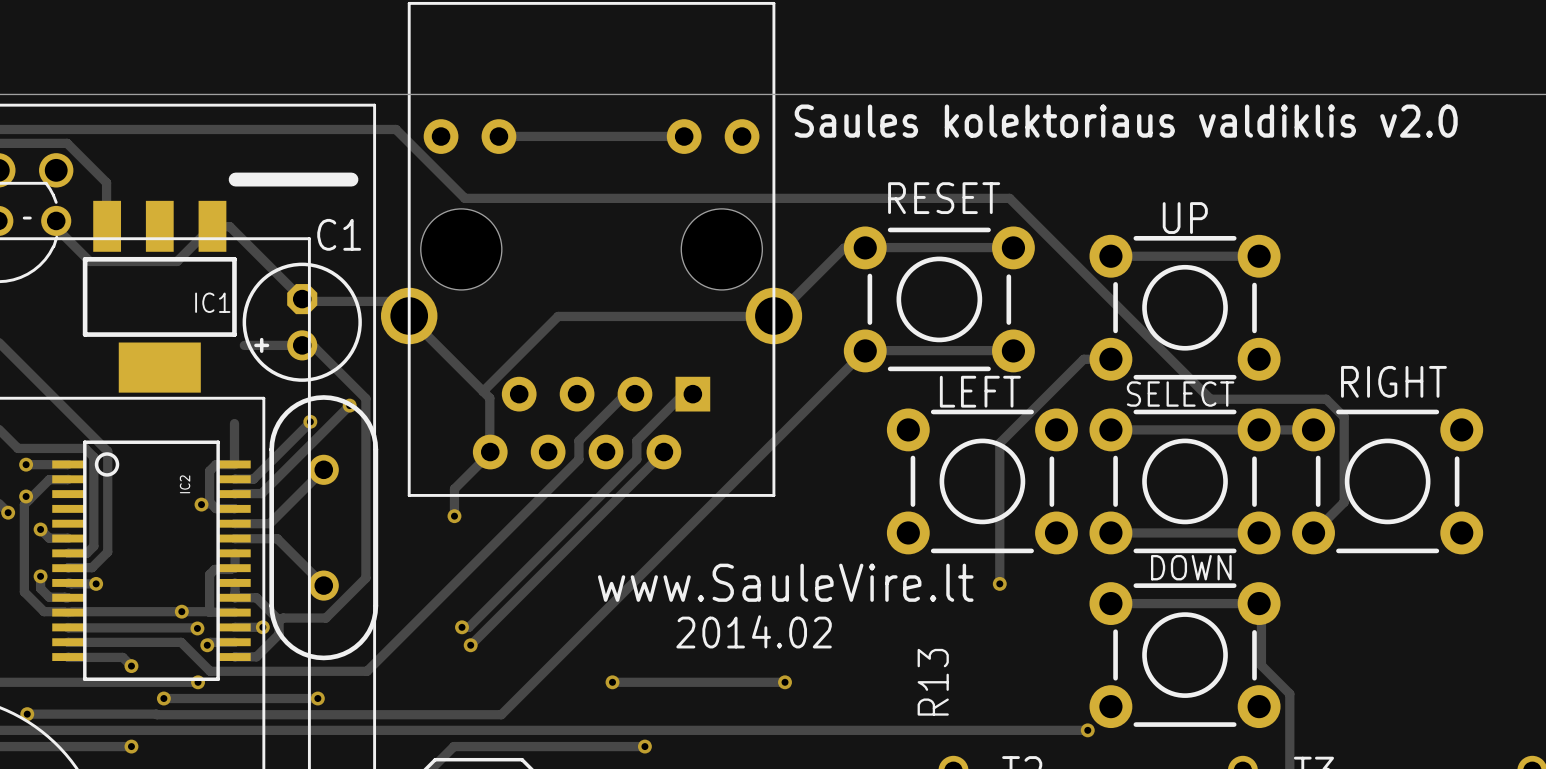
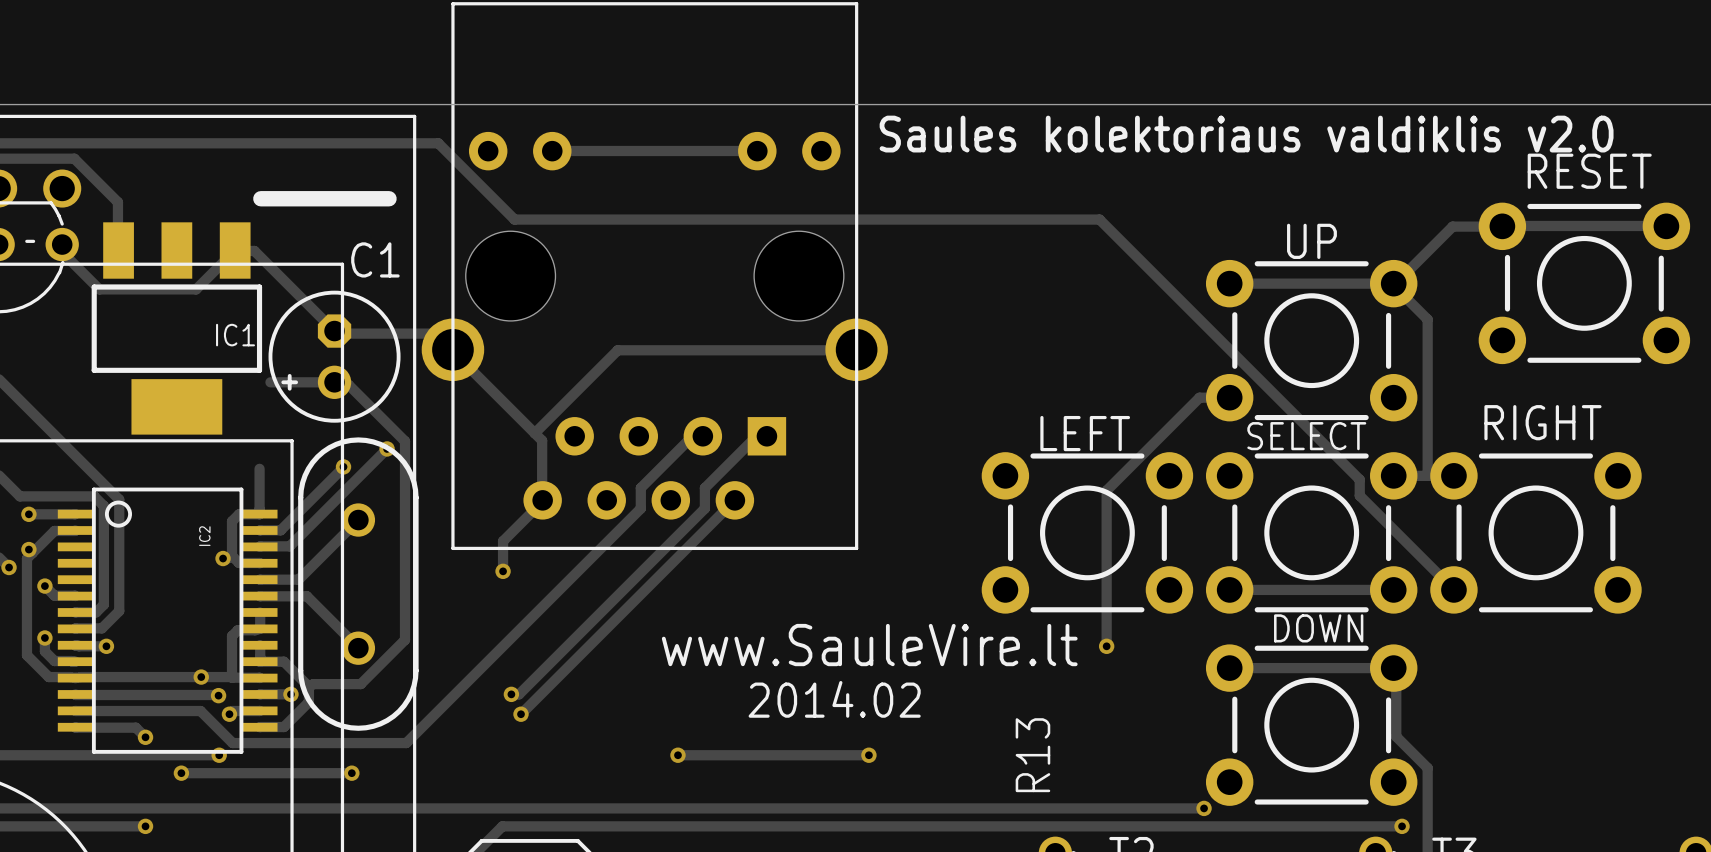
track: (993, 198) (1009, 198) (1210, 399) (1326, 399) (1344, 417) (1344, 502) (1313, 532) -> (1099, 219) (1359, 479) (1359, 495) (1453, 589)
track: none -> (1502, 226) (1452, 226) (1393, 283) (1427, 319) (1427, 475)
track: (865, 247) (1013, 247) -> (1502, 226) (1666, 226)
track: (864, 248) (844, 248) (778, 314) (773, 316) -> none
RESET position: (939, 299) -> (1584, 283)
track: (865, 350) (1013, 350) -> none
track: (864, 351) (501, 714) (27, 714) -> none
track: (1110, 429) (1259, 429) -> none
via: (27, 714) -> none
track: none -> (713, 826) (1402, 826)
via: (644, 746) -> none
via: none -> (1402, 826)

